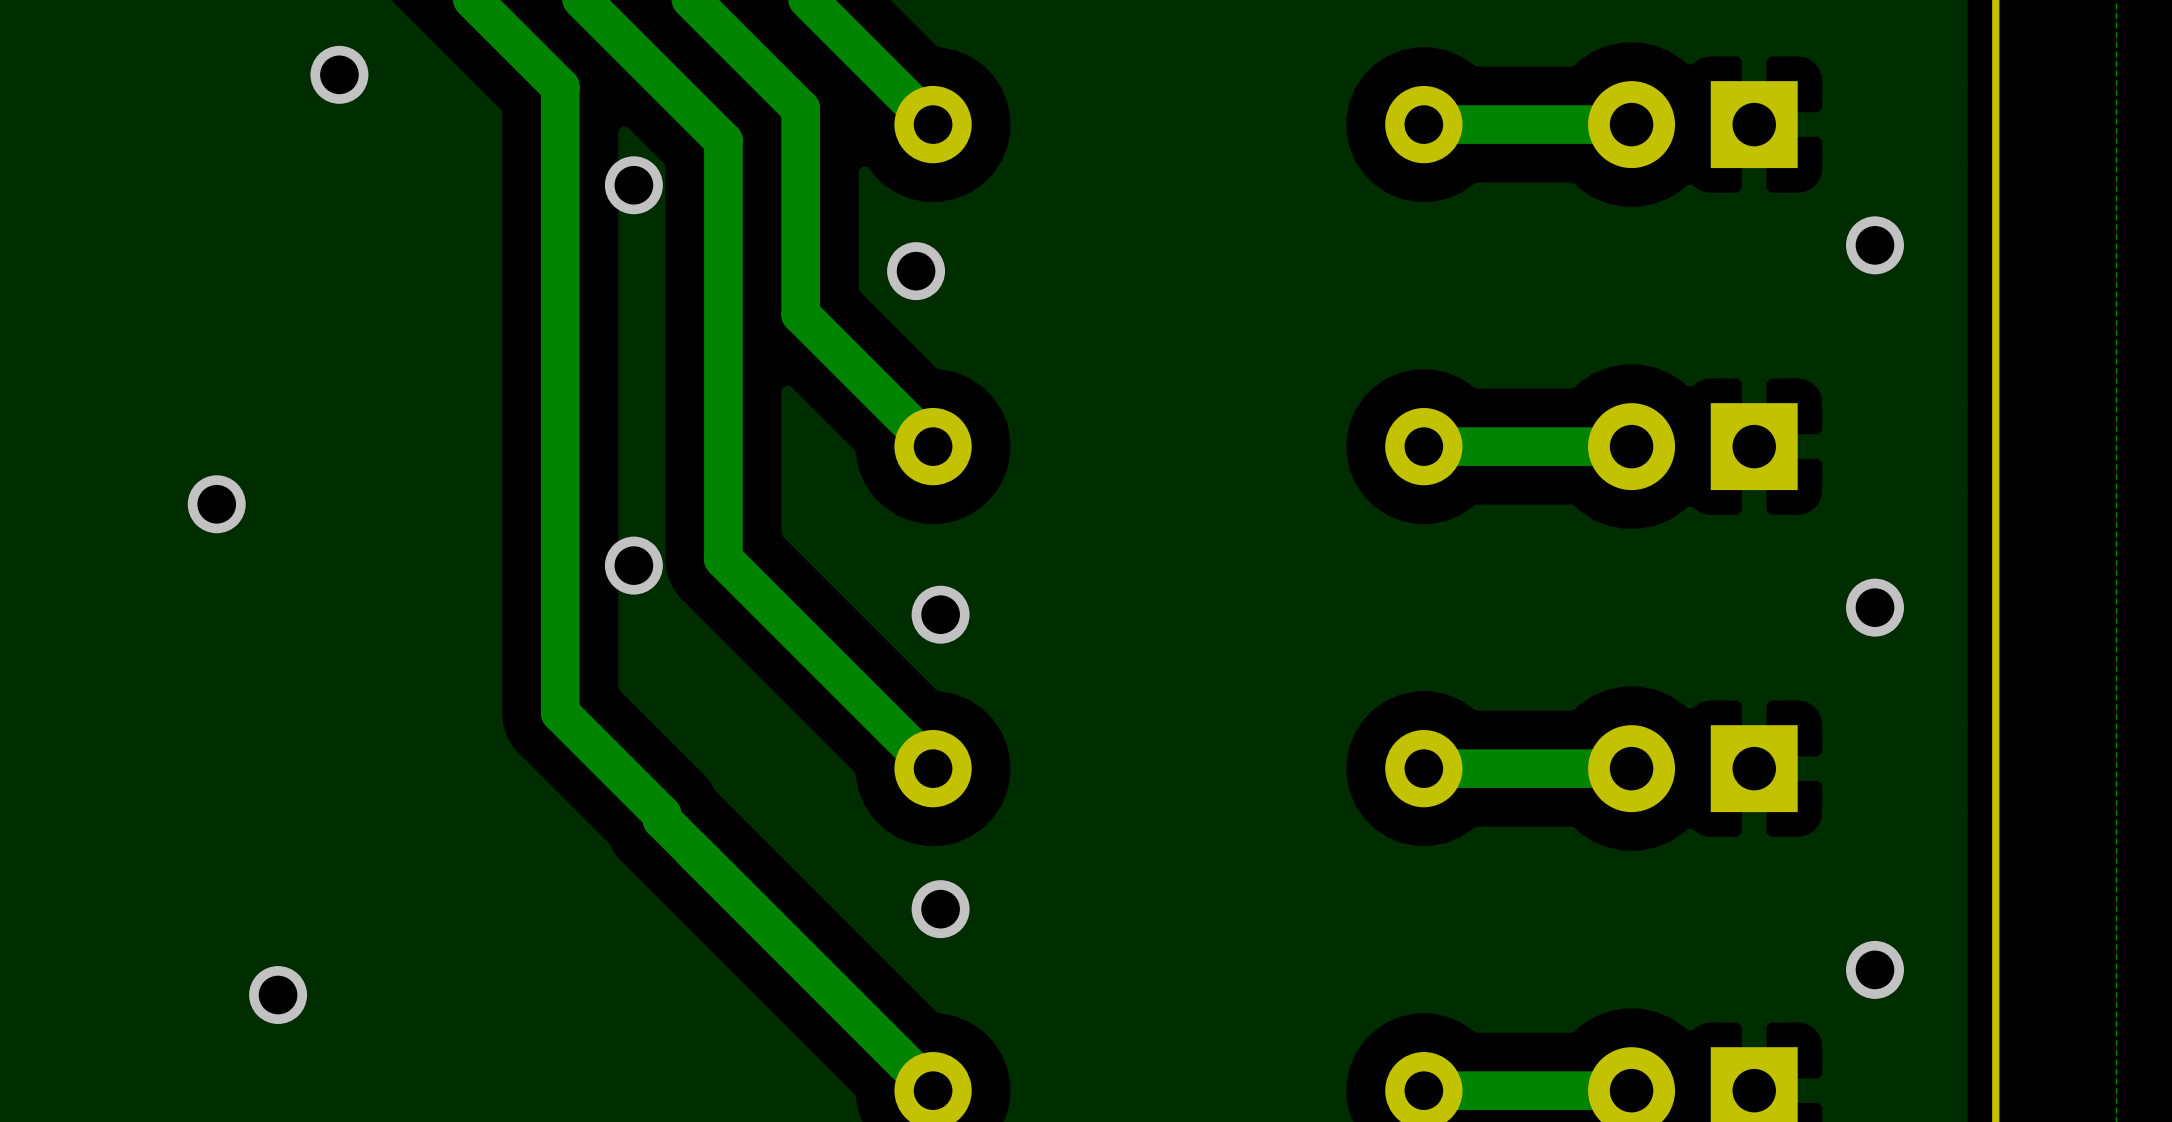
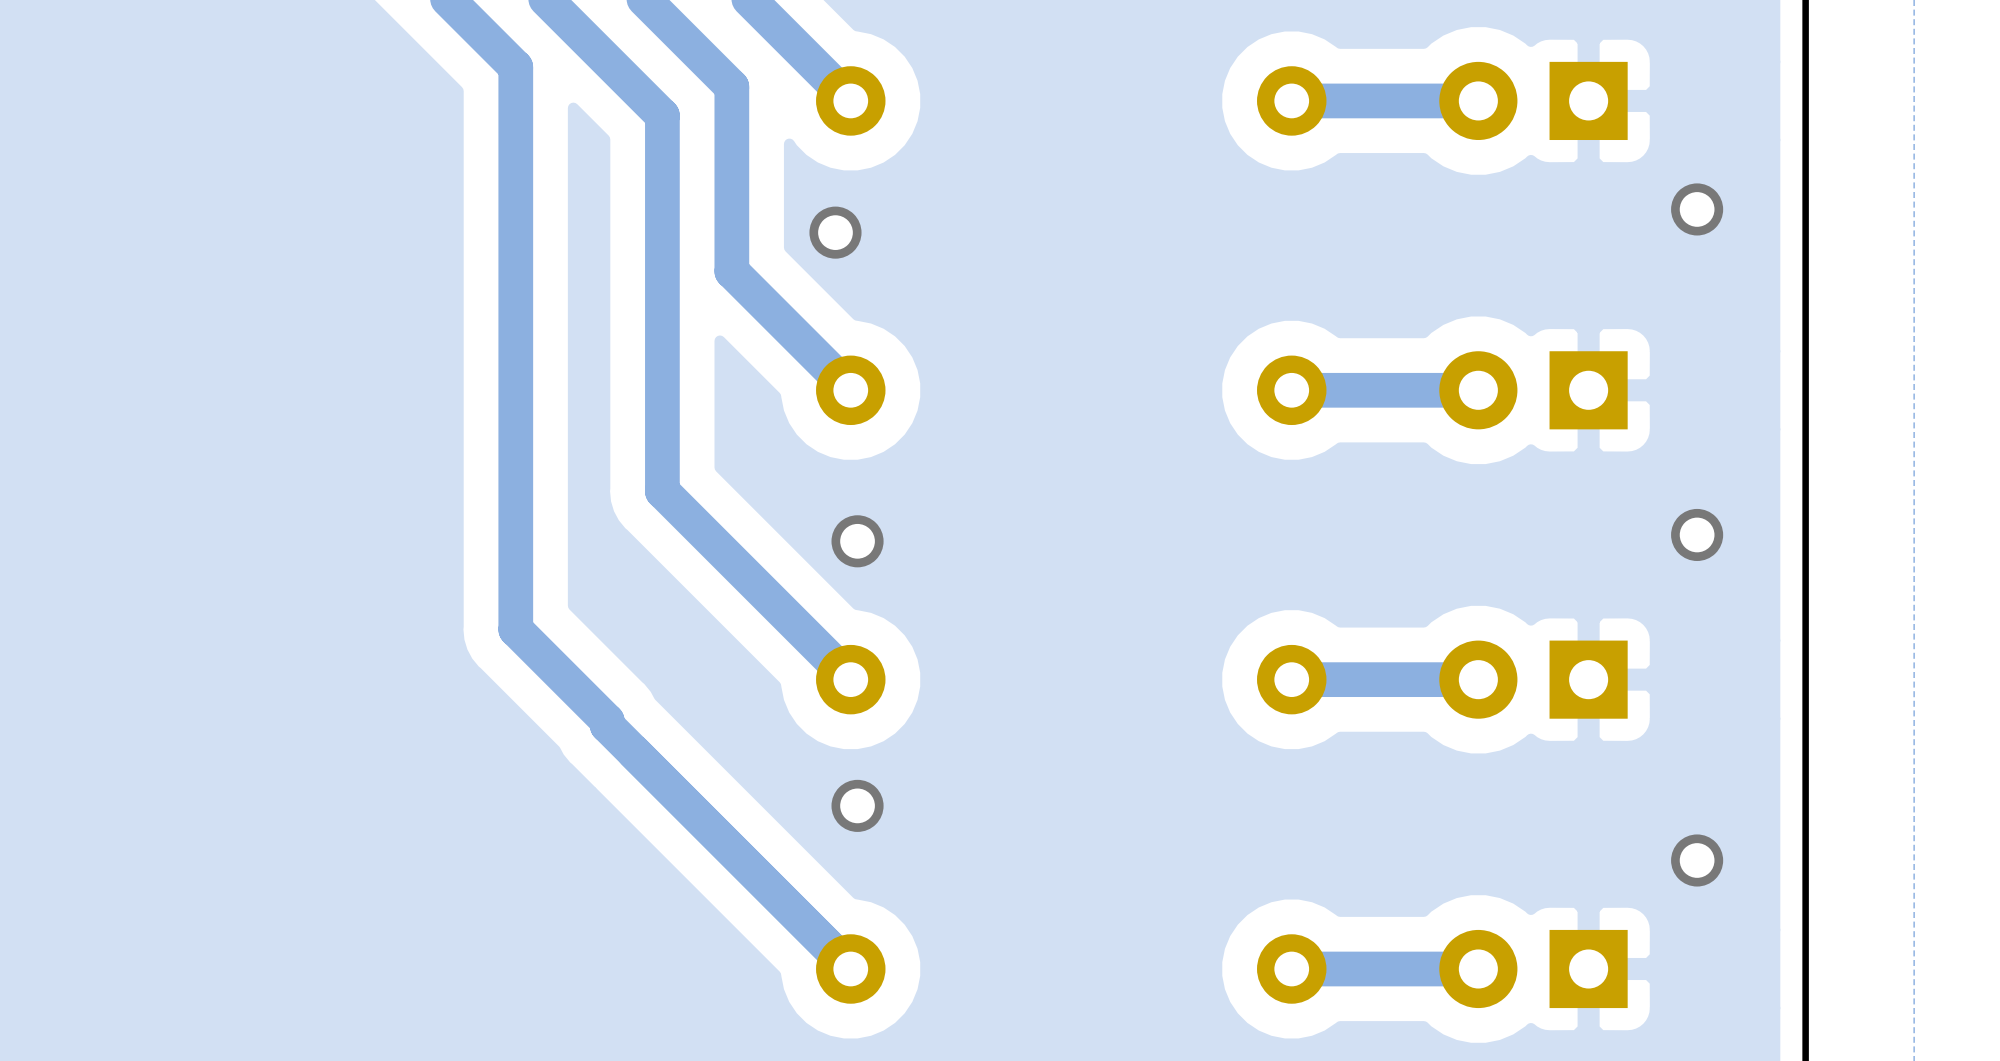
via: (339, 74) -> none
via: (633, 185) -> none
via: (216, 504) -> none
via: (633, 565) -> none
via: (278, 995) -> none

